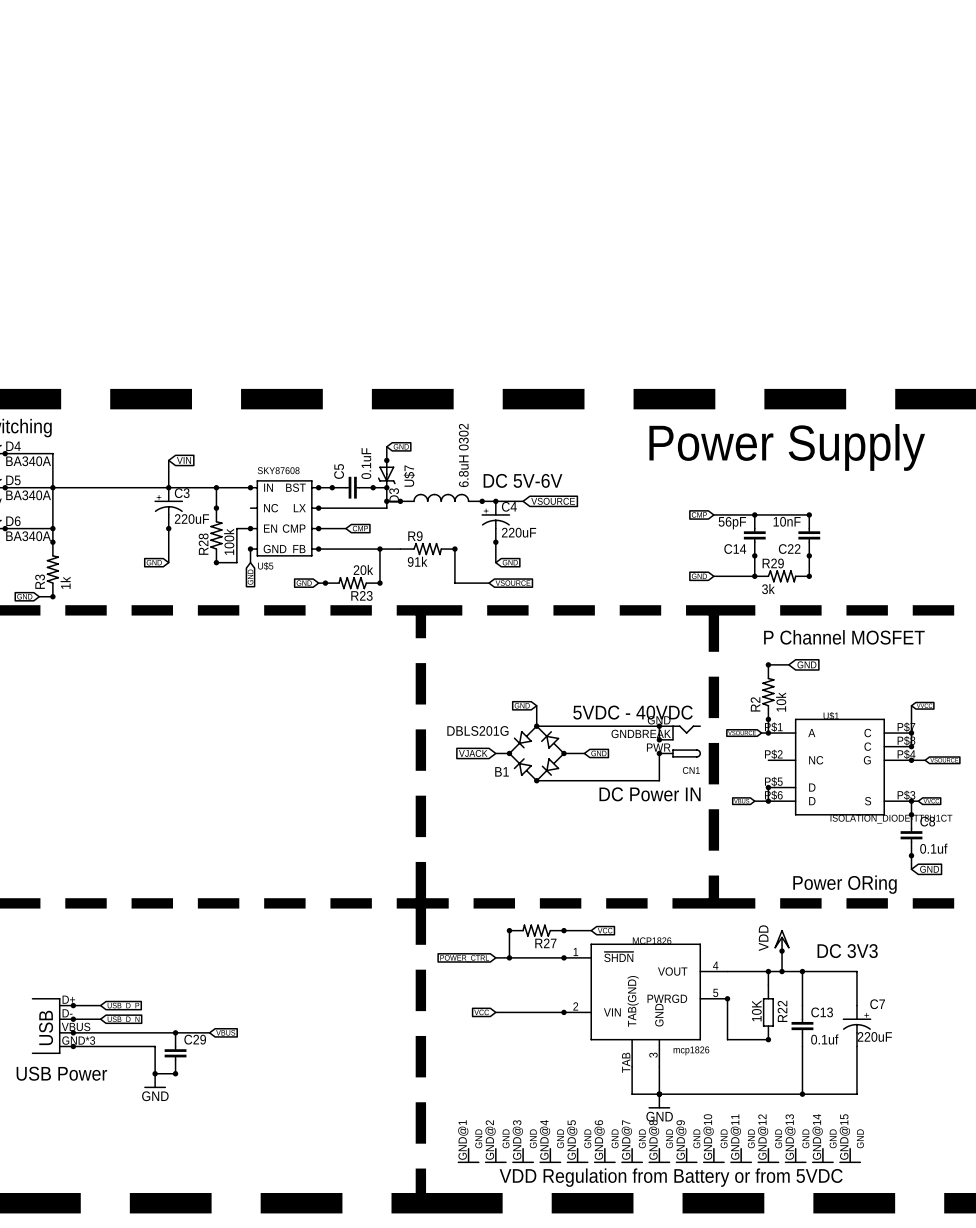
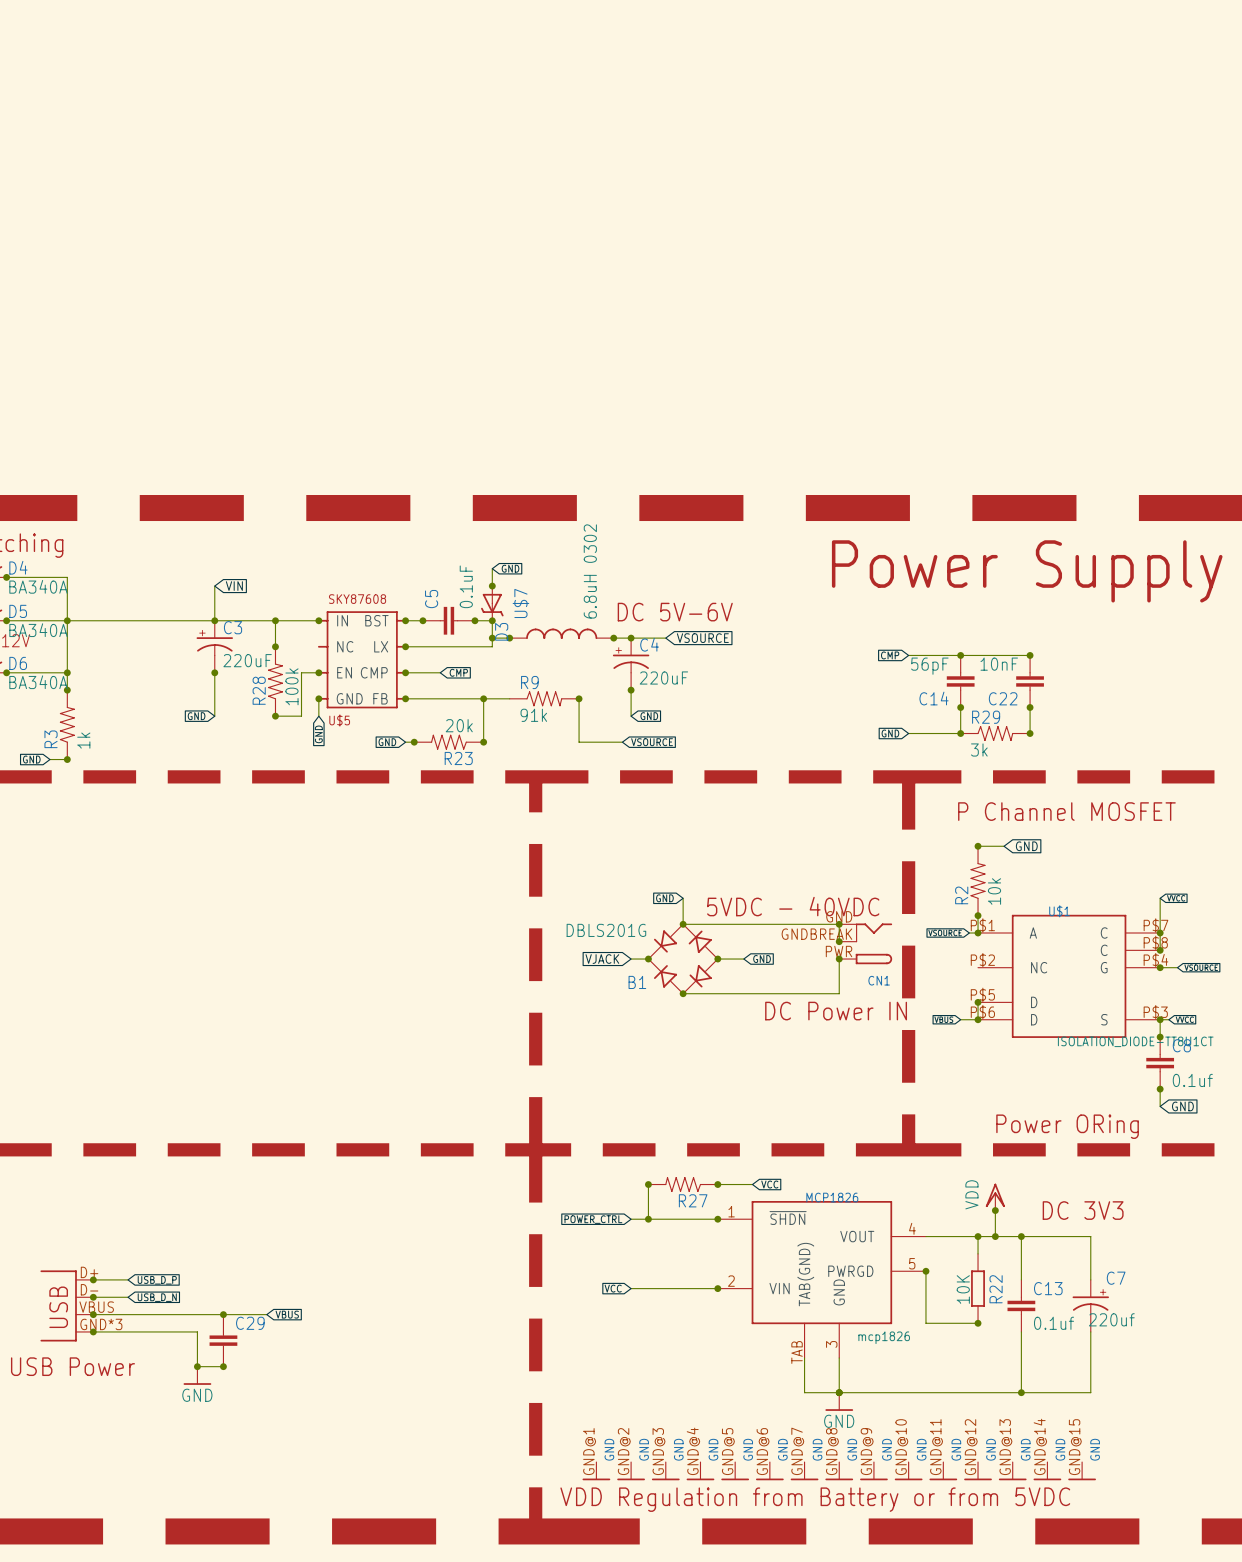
C7 value: 220uF (874, 1036) -> 220uf (1111, 1319)

